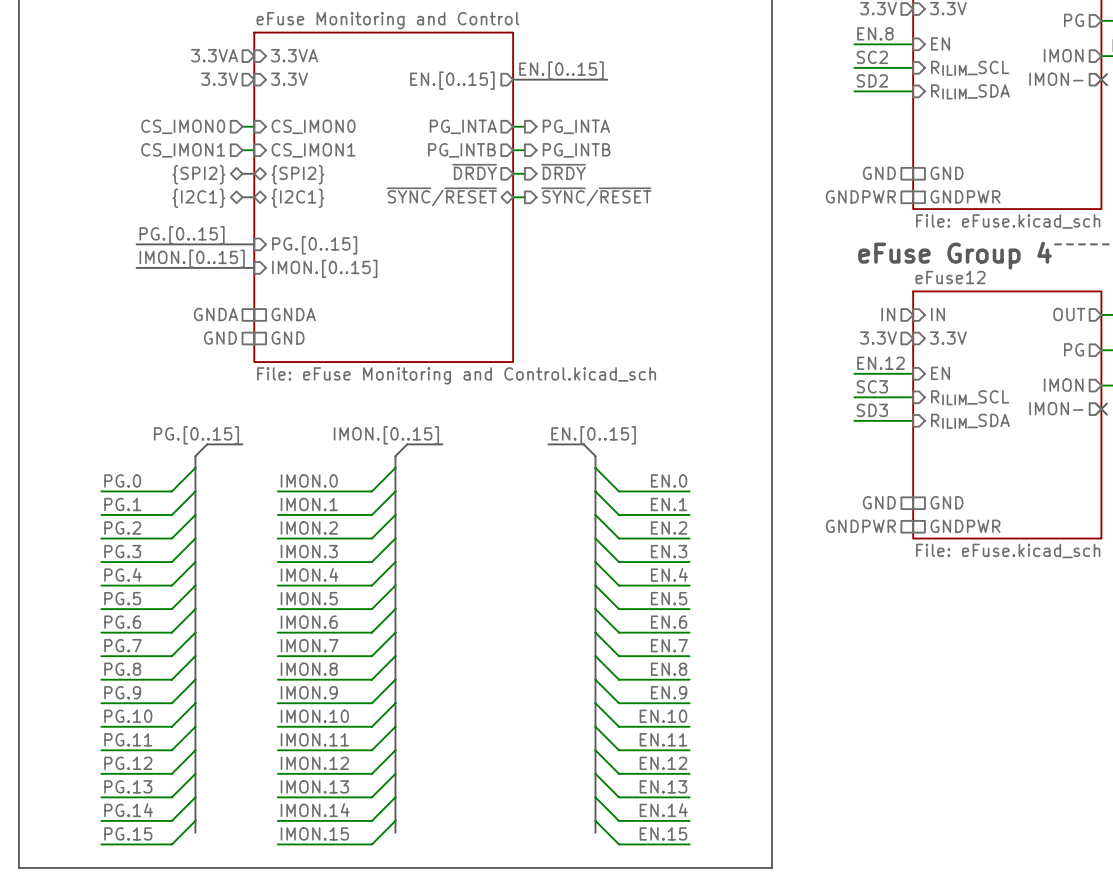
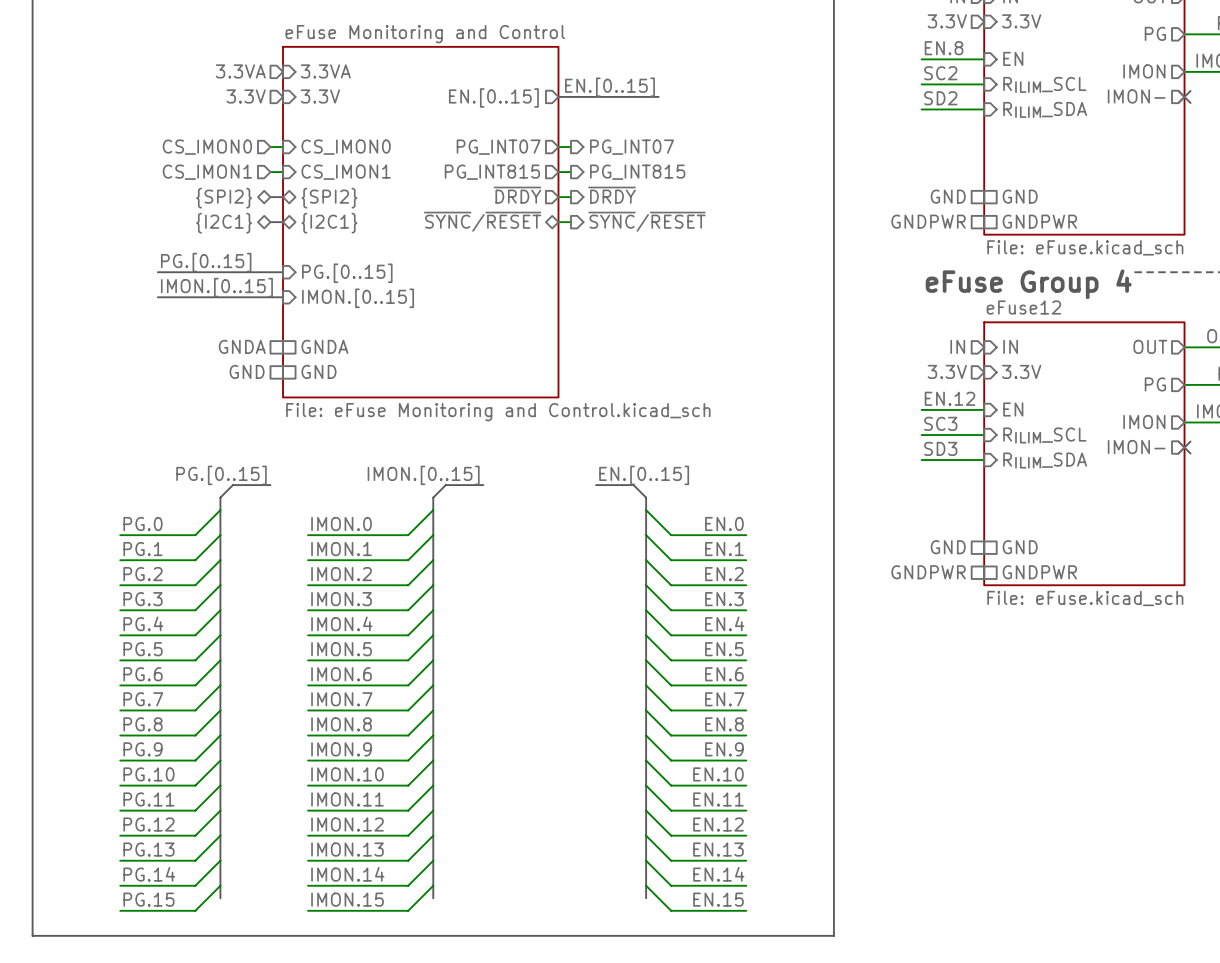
sheet pin: PG_INTA (463, 126) -> PG_INT07 (498, 147)
hierarchical label: PG_INTA (576, 126) -> PG_INT07 (632, 147)
sheet pin: PG_INTB (461, 150) -> PG_INT815 (492, 172)
hierarchical label: PG_INTB (576, 150) -> PG_INT815 (637, 172)

